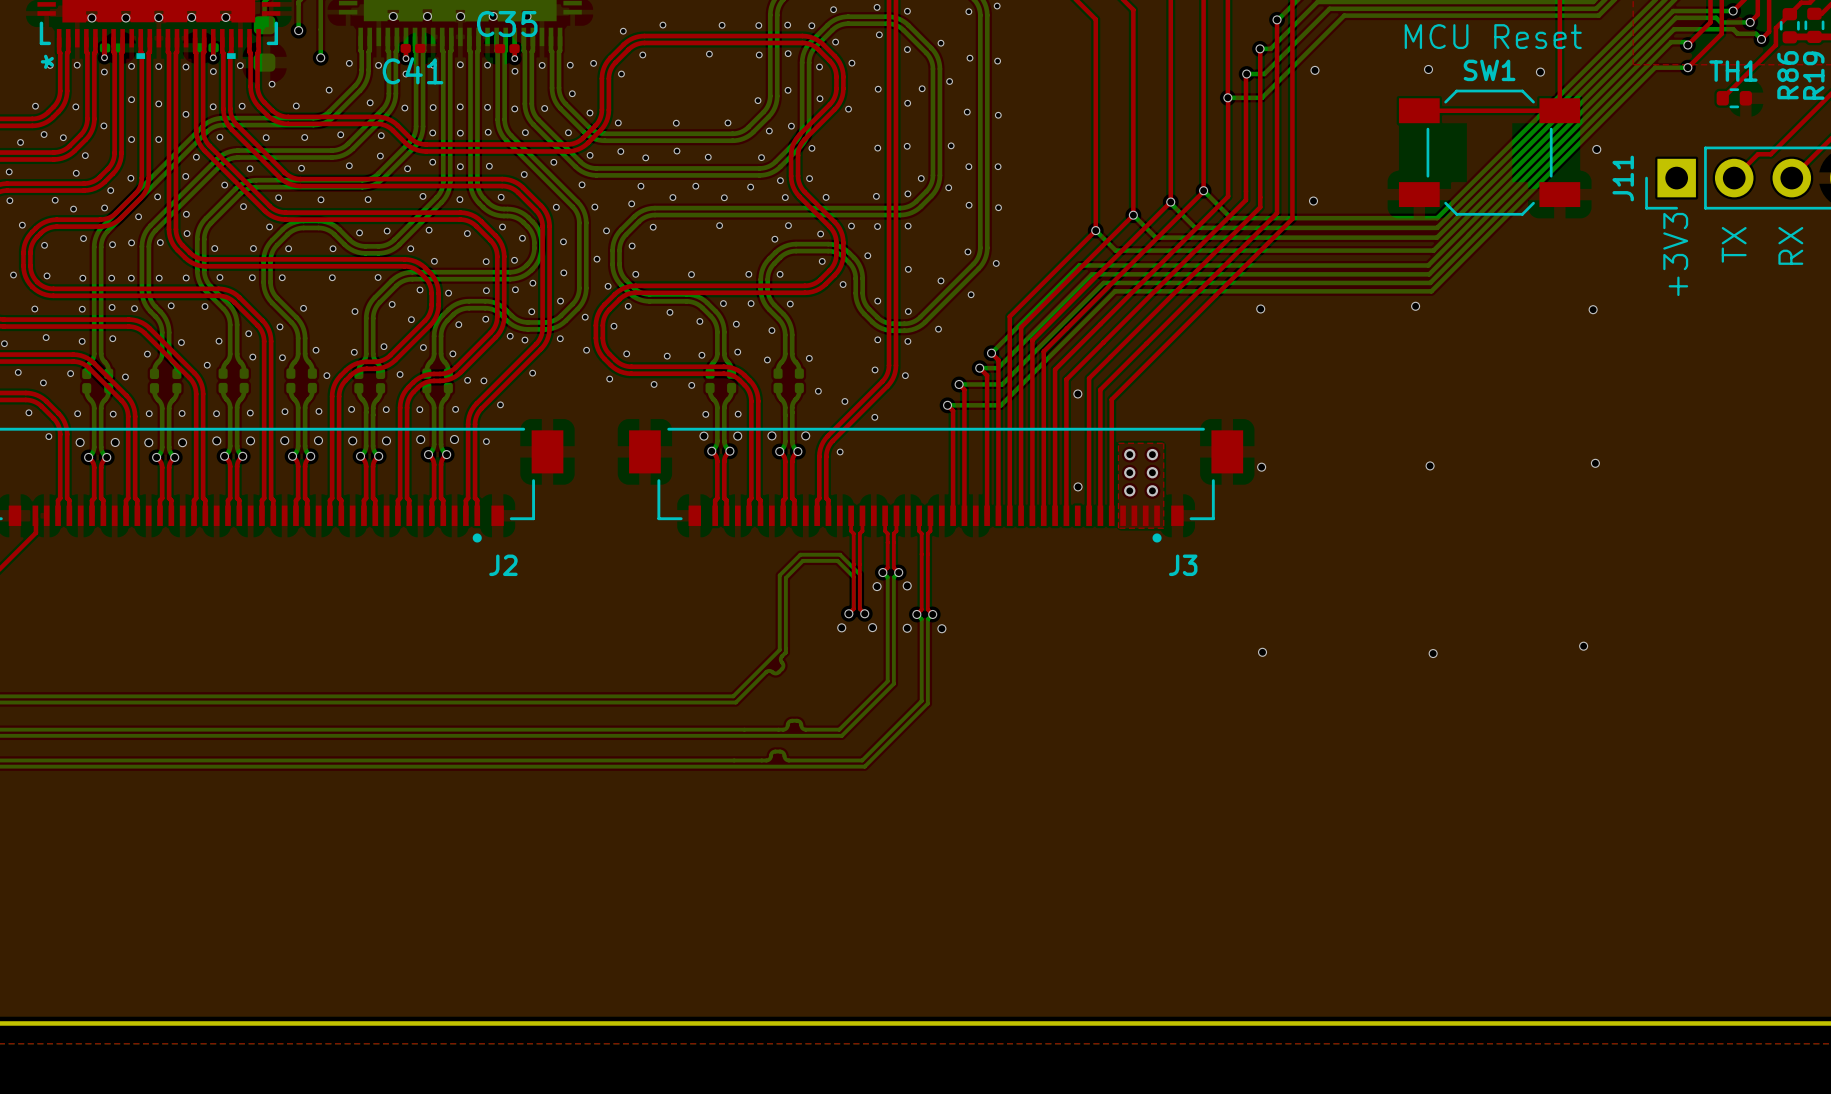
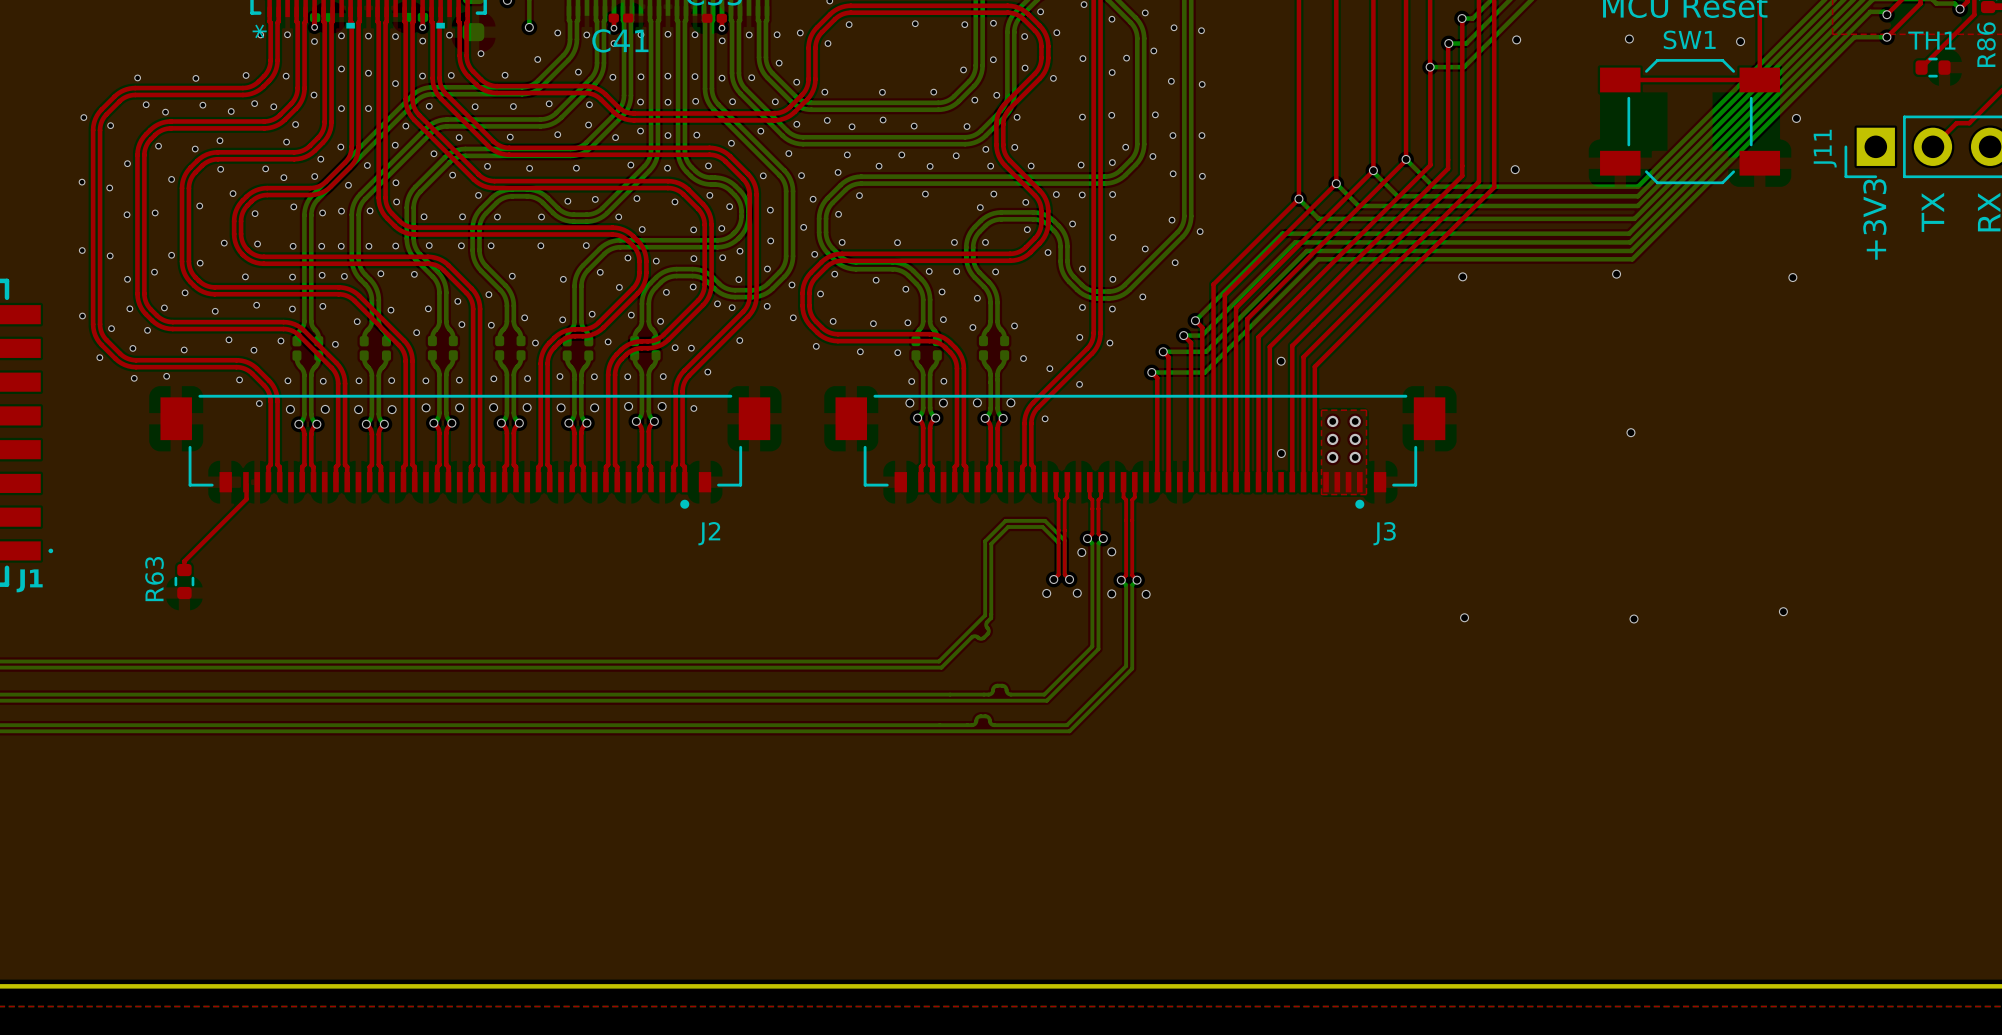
via: (1595, 463) -> none
via: (1261, 467) -> none

